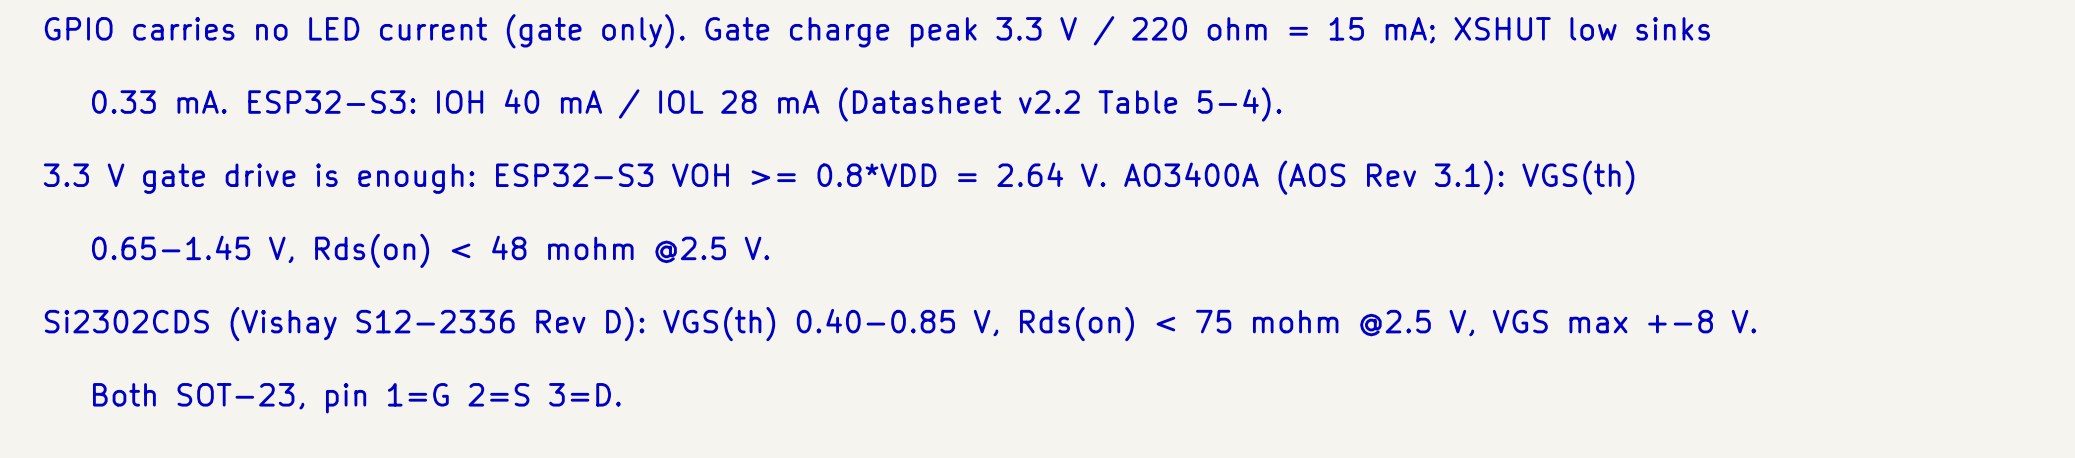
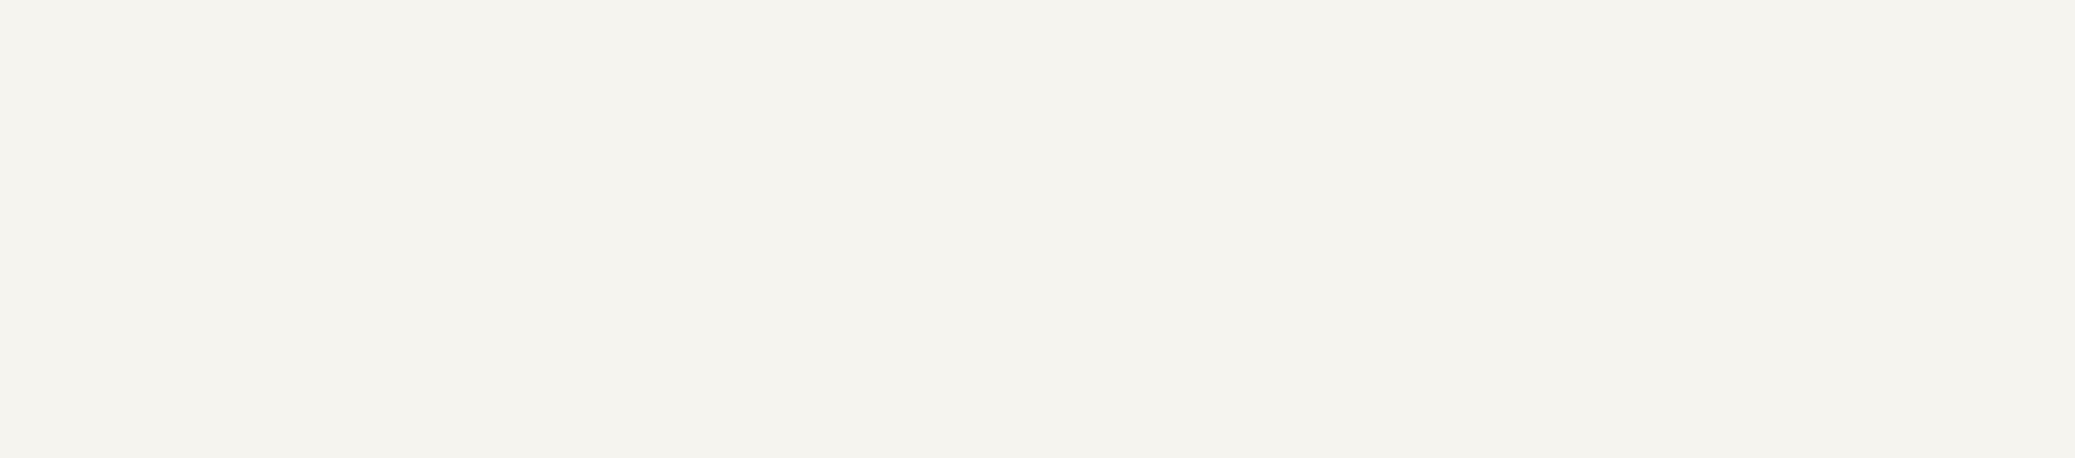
text: GPIO carries no LED current (gate only). Gate charge peak 3.3 V / 220 ohm = 15 mA; XSHUT low sinks (877, 31) -> none
text: 0.33 mA. ESP32-S3: IOH 40 mA / IOL 28 mA (Datasheet v2.2 Table 5-4). (686, 104) -> none
text: 3.3 V gate drive is enough: ESP32-S3 VOH >= 0.8*VDD = 2.64 V. AO3400A (AOS Rev 3.1): VGS(th) (839, 177) -> none
text: 0.65-1.45 V, Rds(on) < 48 mohm @2.5 V. (430, 250) -> none
text: Si2302CDS (Vishay S12-2336 Rev D): VGS(th) 0.40-0.85 V, Rds(on) < 75 mohm @2.5 V, VGS max +-8 V. (900, 324) -> none
text: Both SOT-23, pin 1=G 2=S 3=D. (356, 398) -> none

